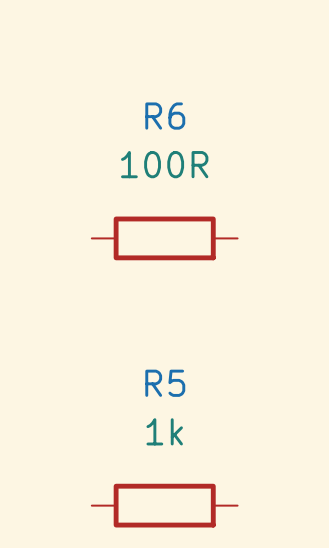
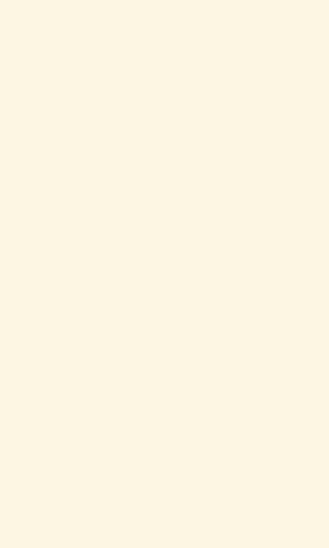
R6: 100R (164, 238) -> none
R5: 1k (164, 505) -> none

